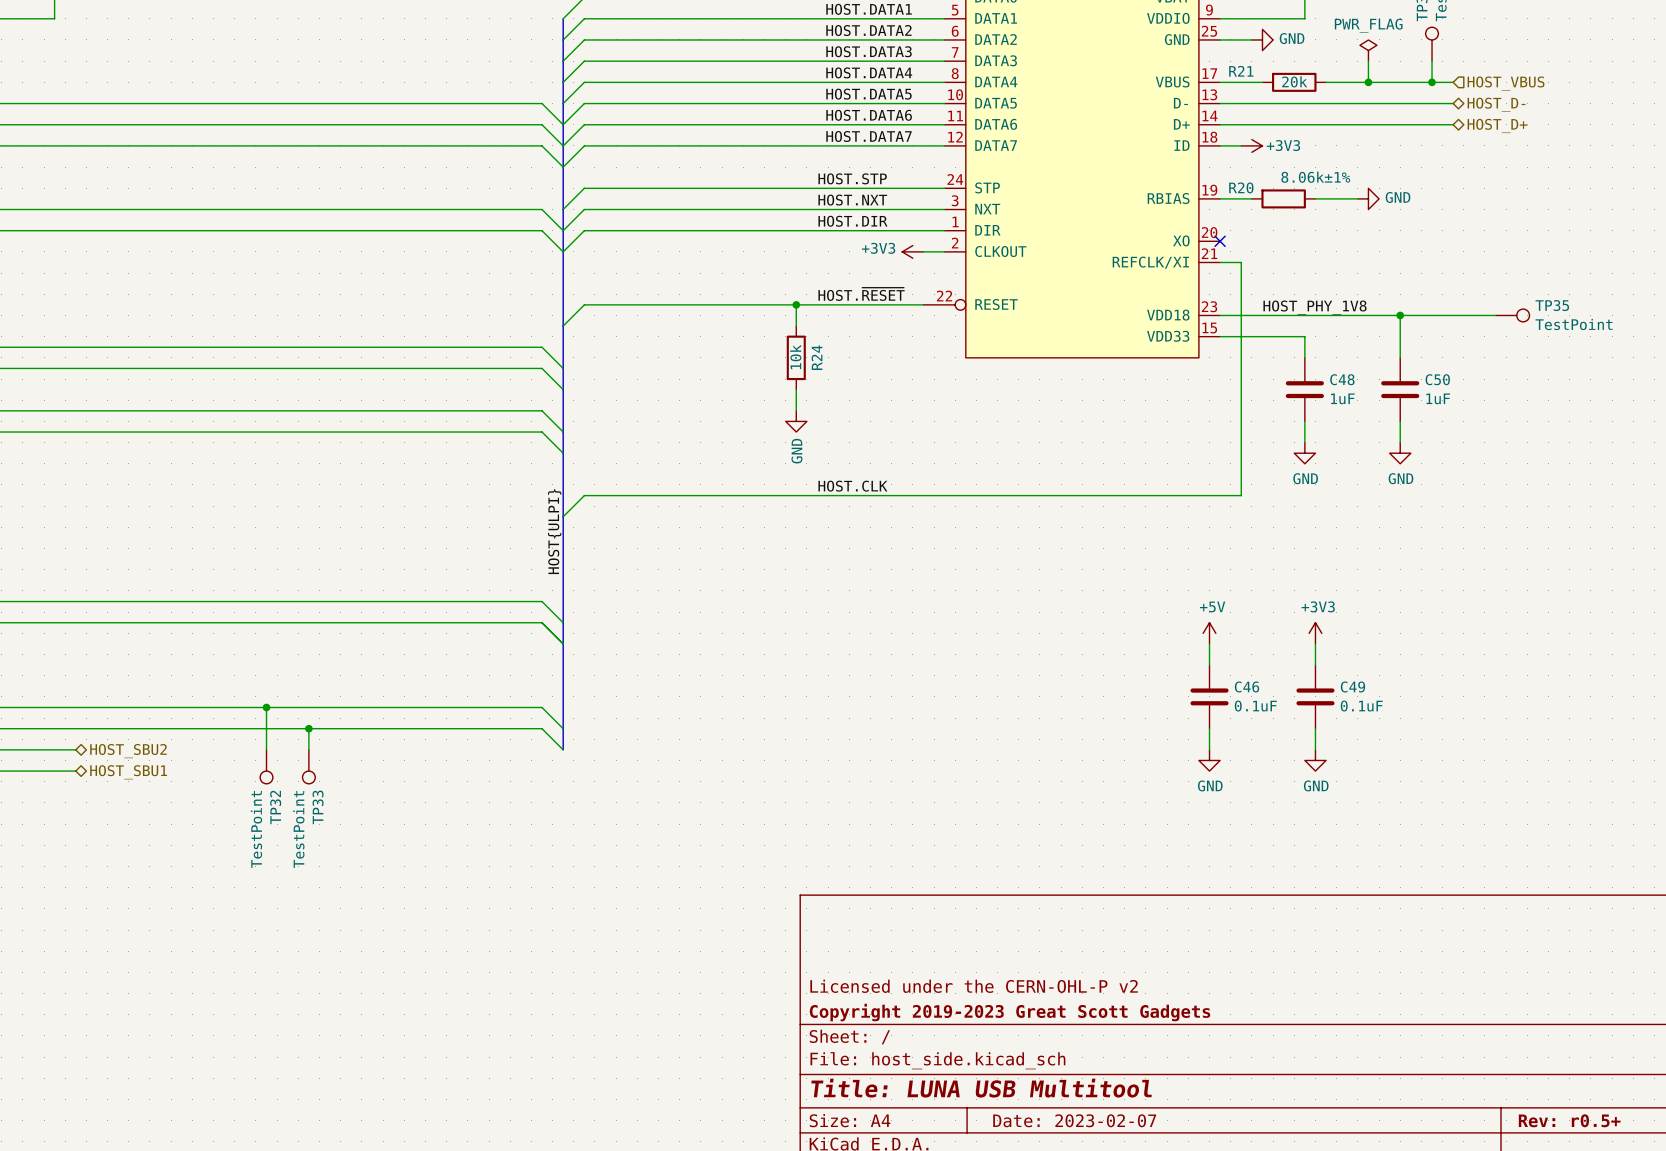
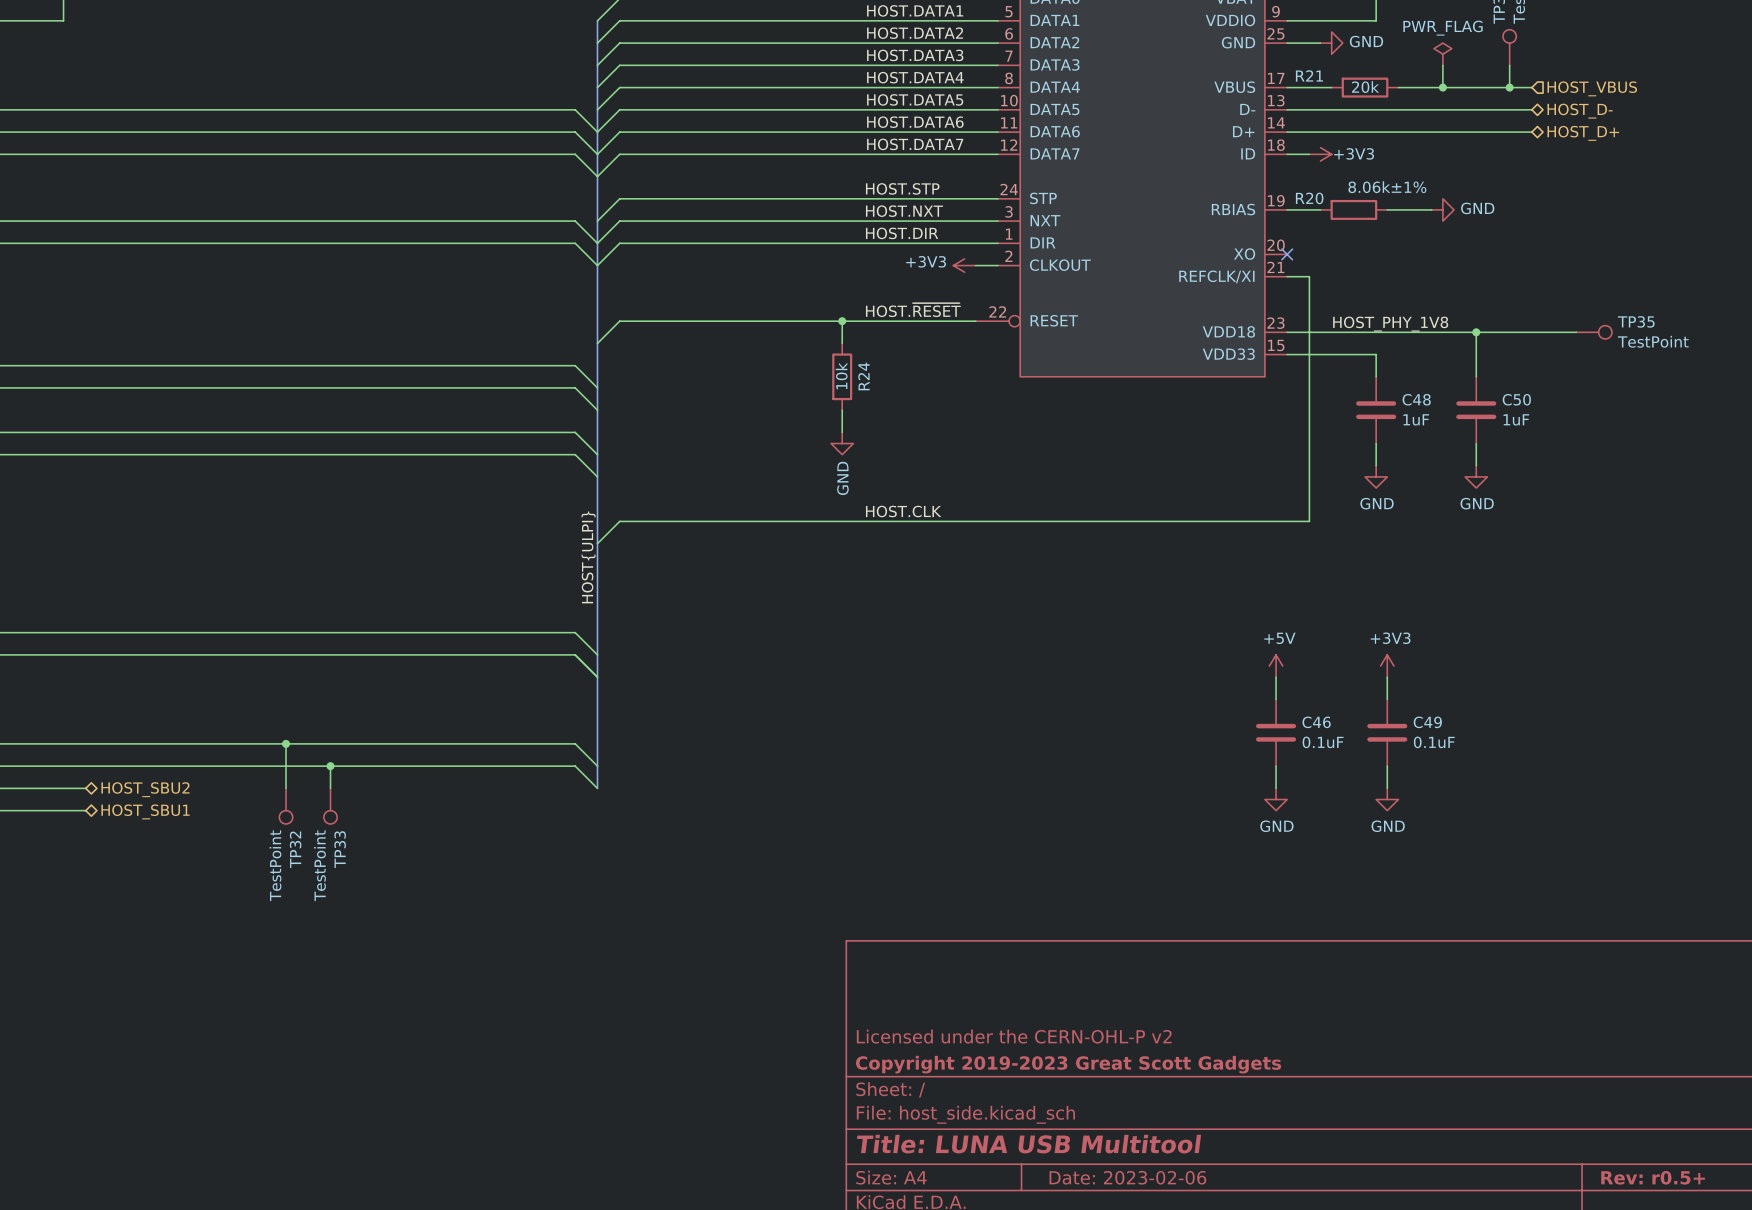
title block: Date: 2023-02-07 (1074, 1120) -> Date: 2023-02-06 (1127, 1177)

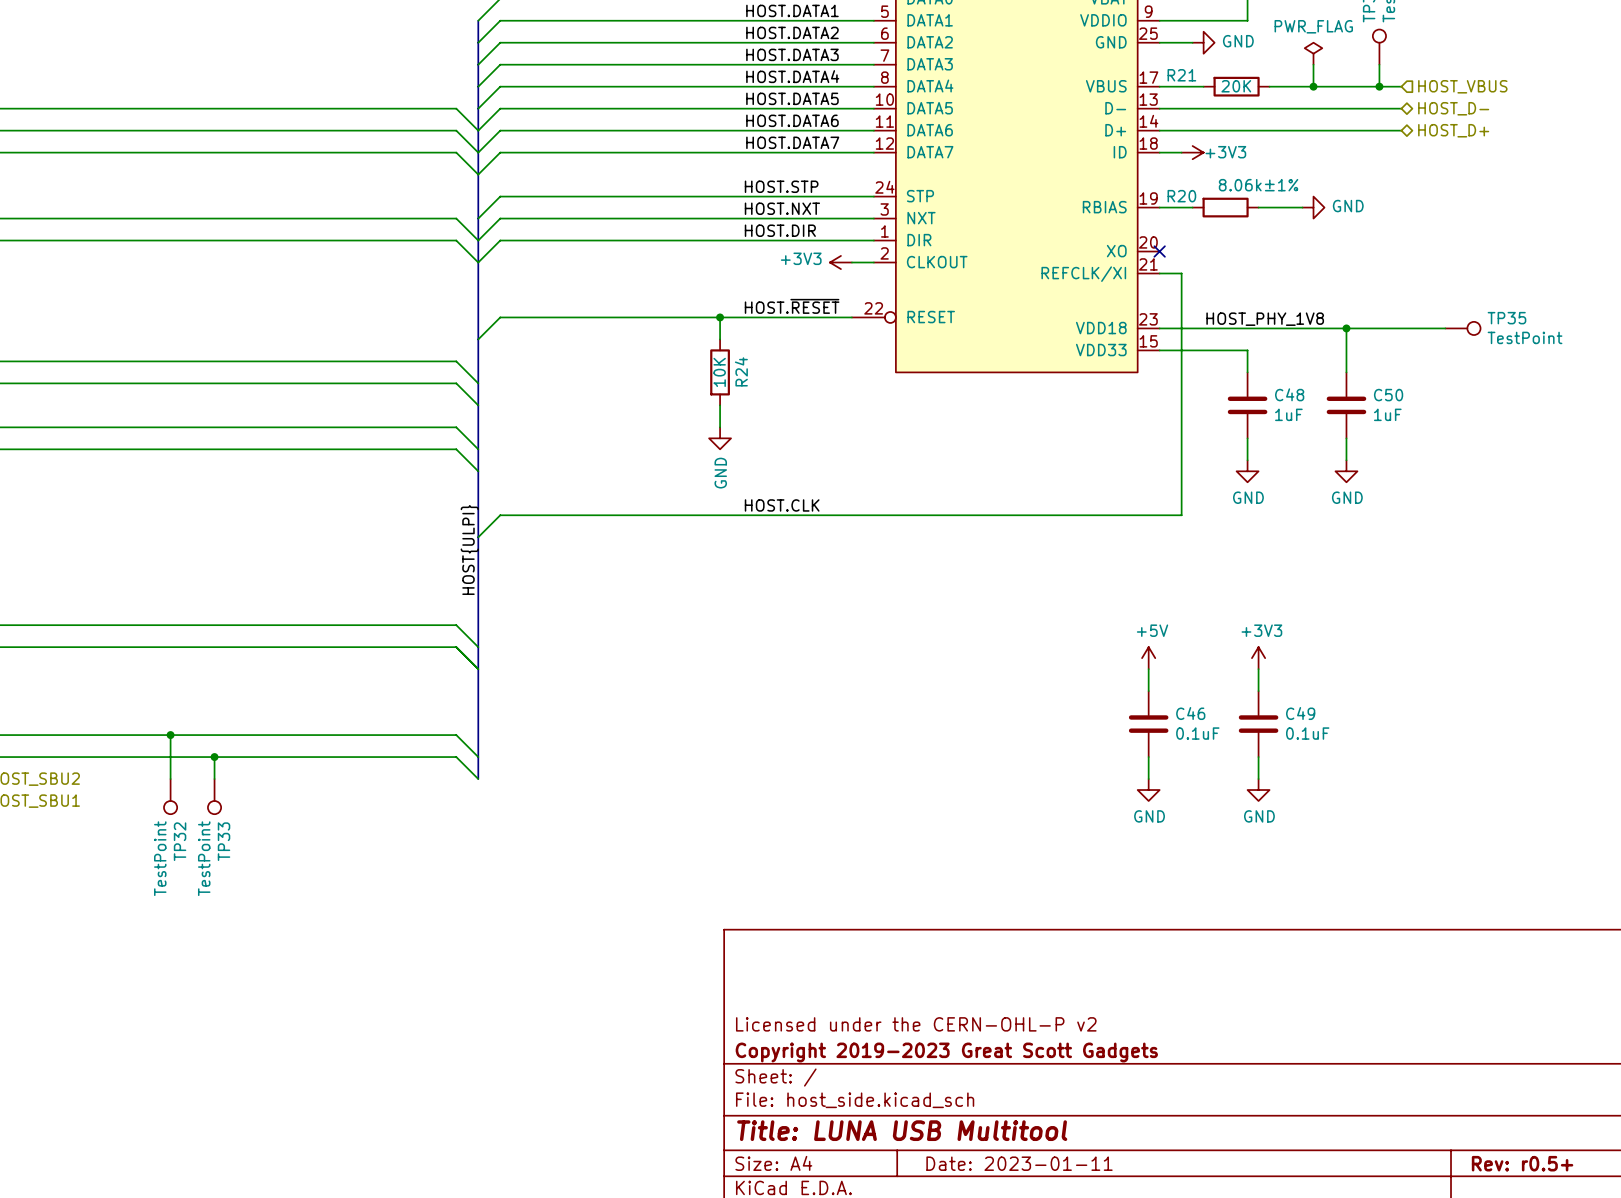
R21 value: 20k (1365, 87) -> 20K (1236, 86)
R24 value: 10k (841, 375) -> 10K (719, 372)
title block: Date: 2023-02-06 (1127, 1177) -> Date: 2023-01-11 (1019, 1163)

